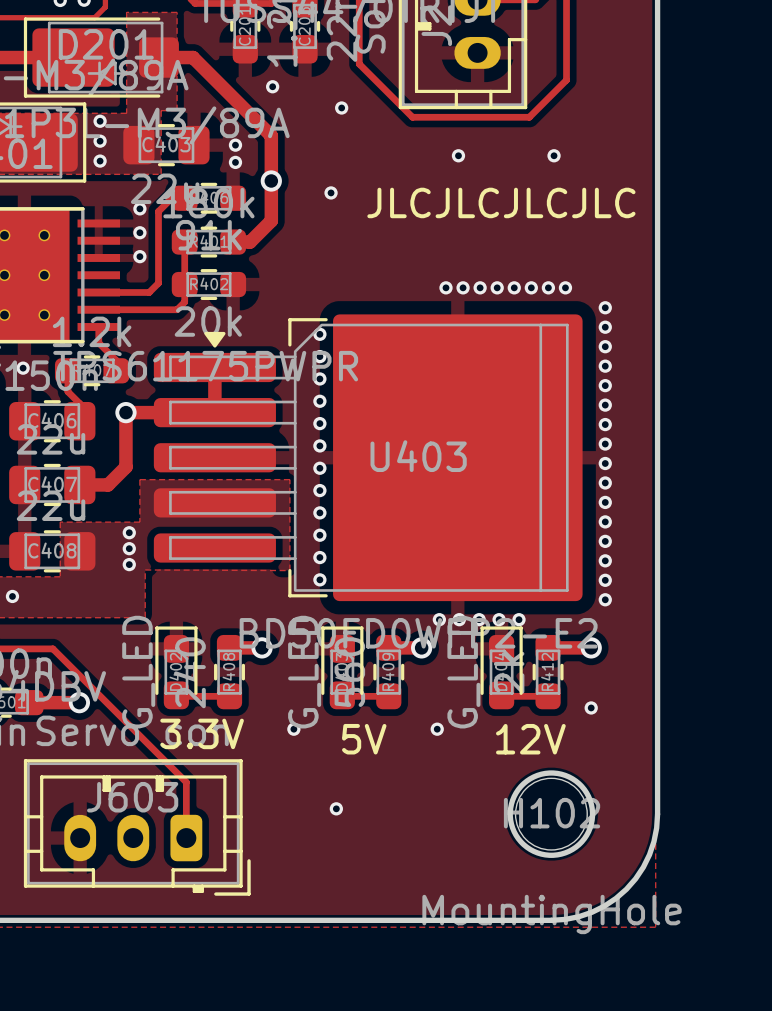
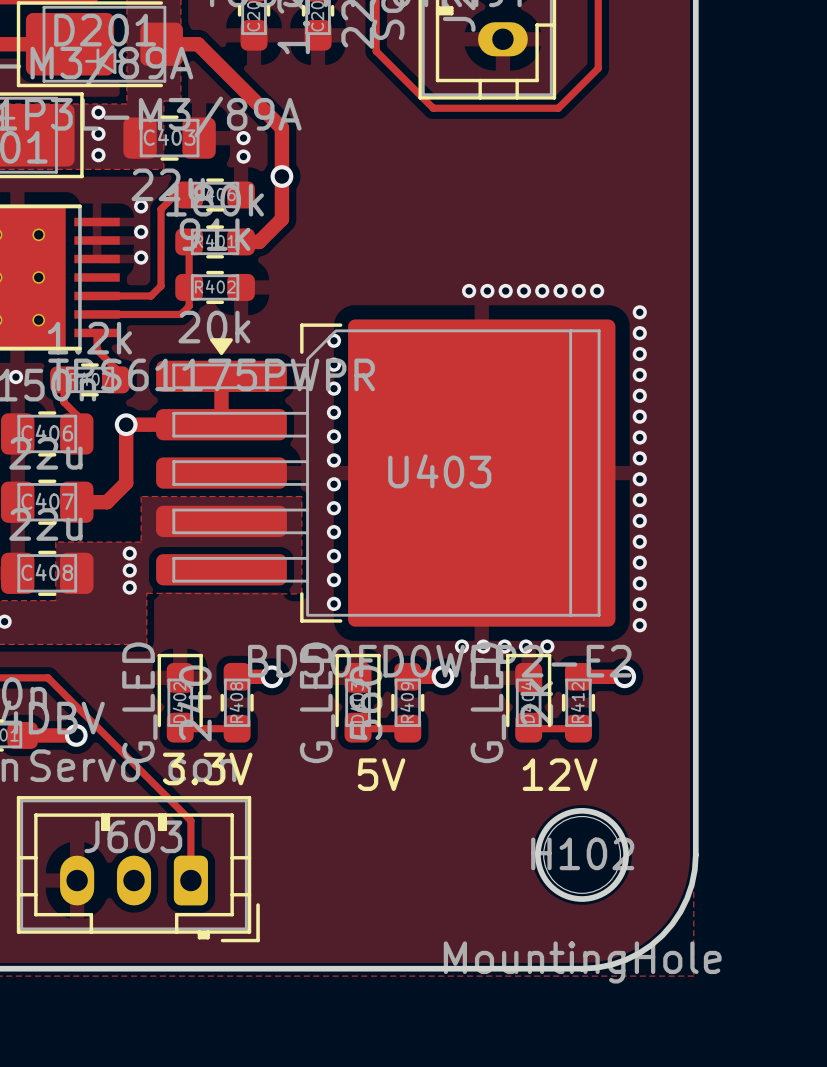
via: (272, 86) -> none
via: (341, 107) -> none
via: (458, 155) -> none
via: (554, 155) -> none
via: (331, 192) -> none
text: JLCJLCJLCJLC (501, 202) -> none
via: (591, 707) -> none
via: (293, 729) -> none
via: (437, 729) -> none
via: (336, 808) -> none

